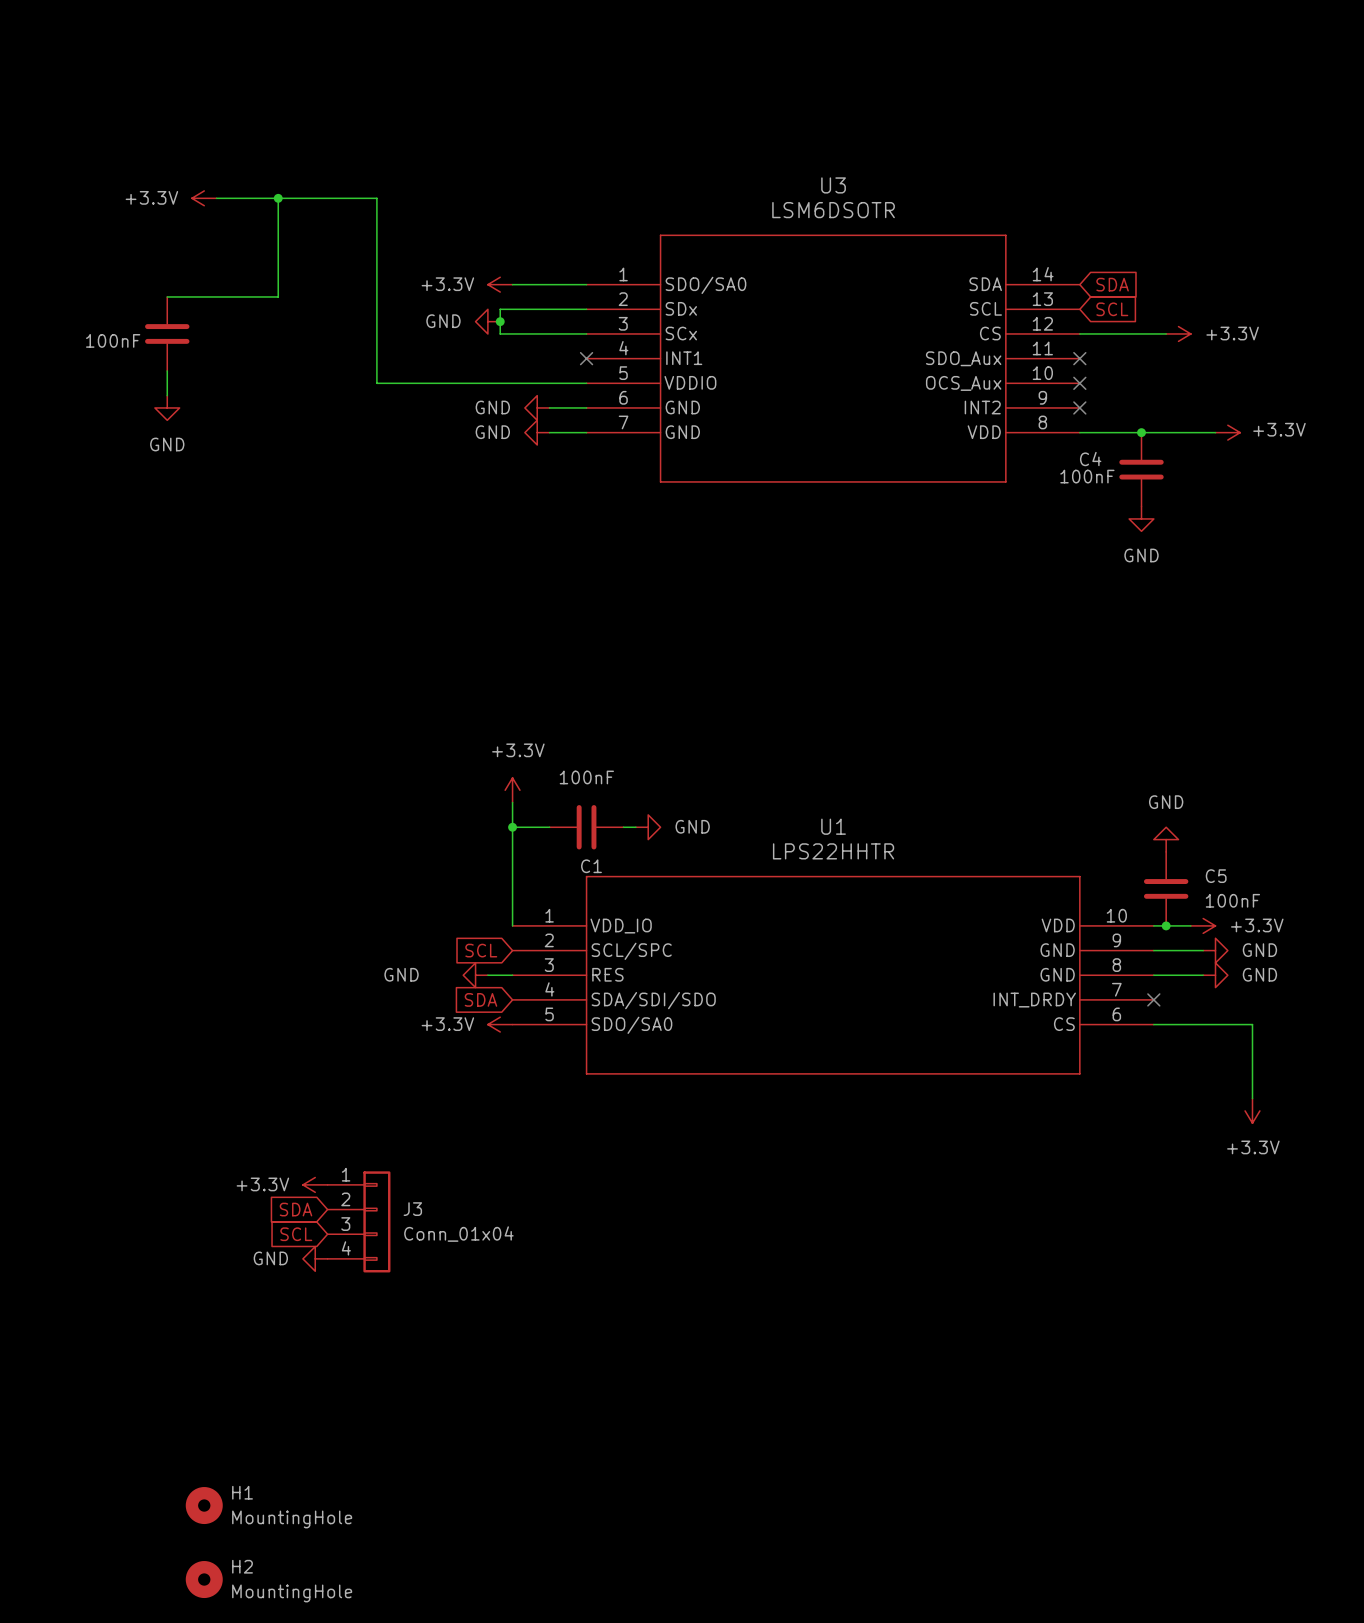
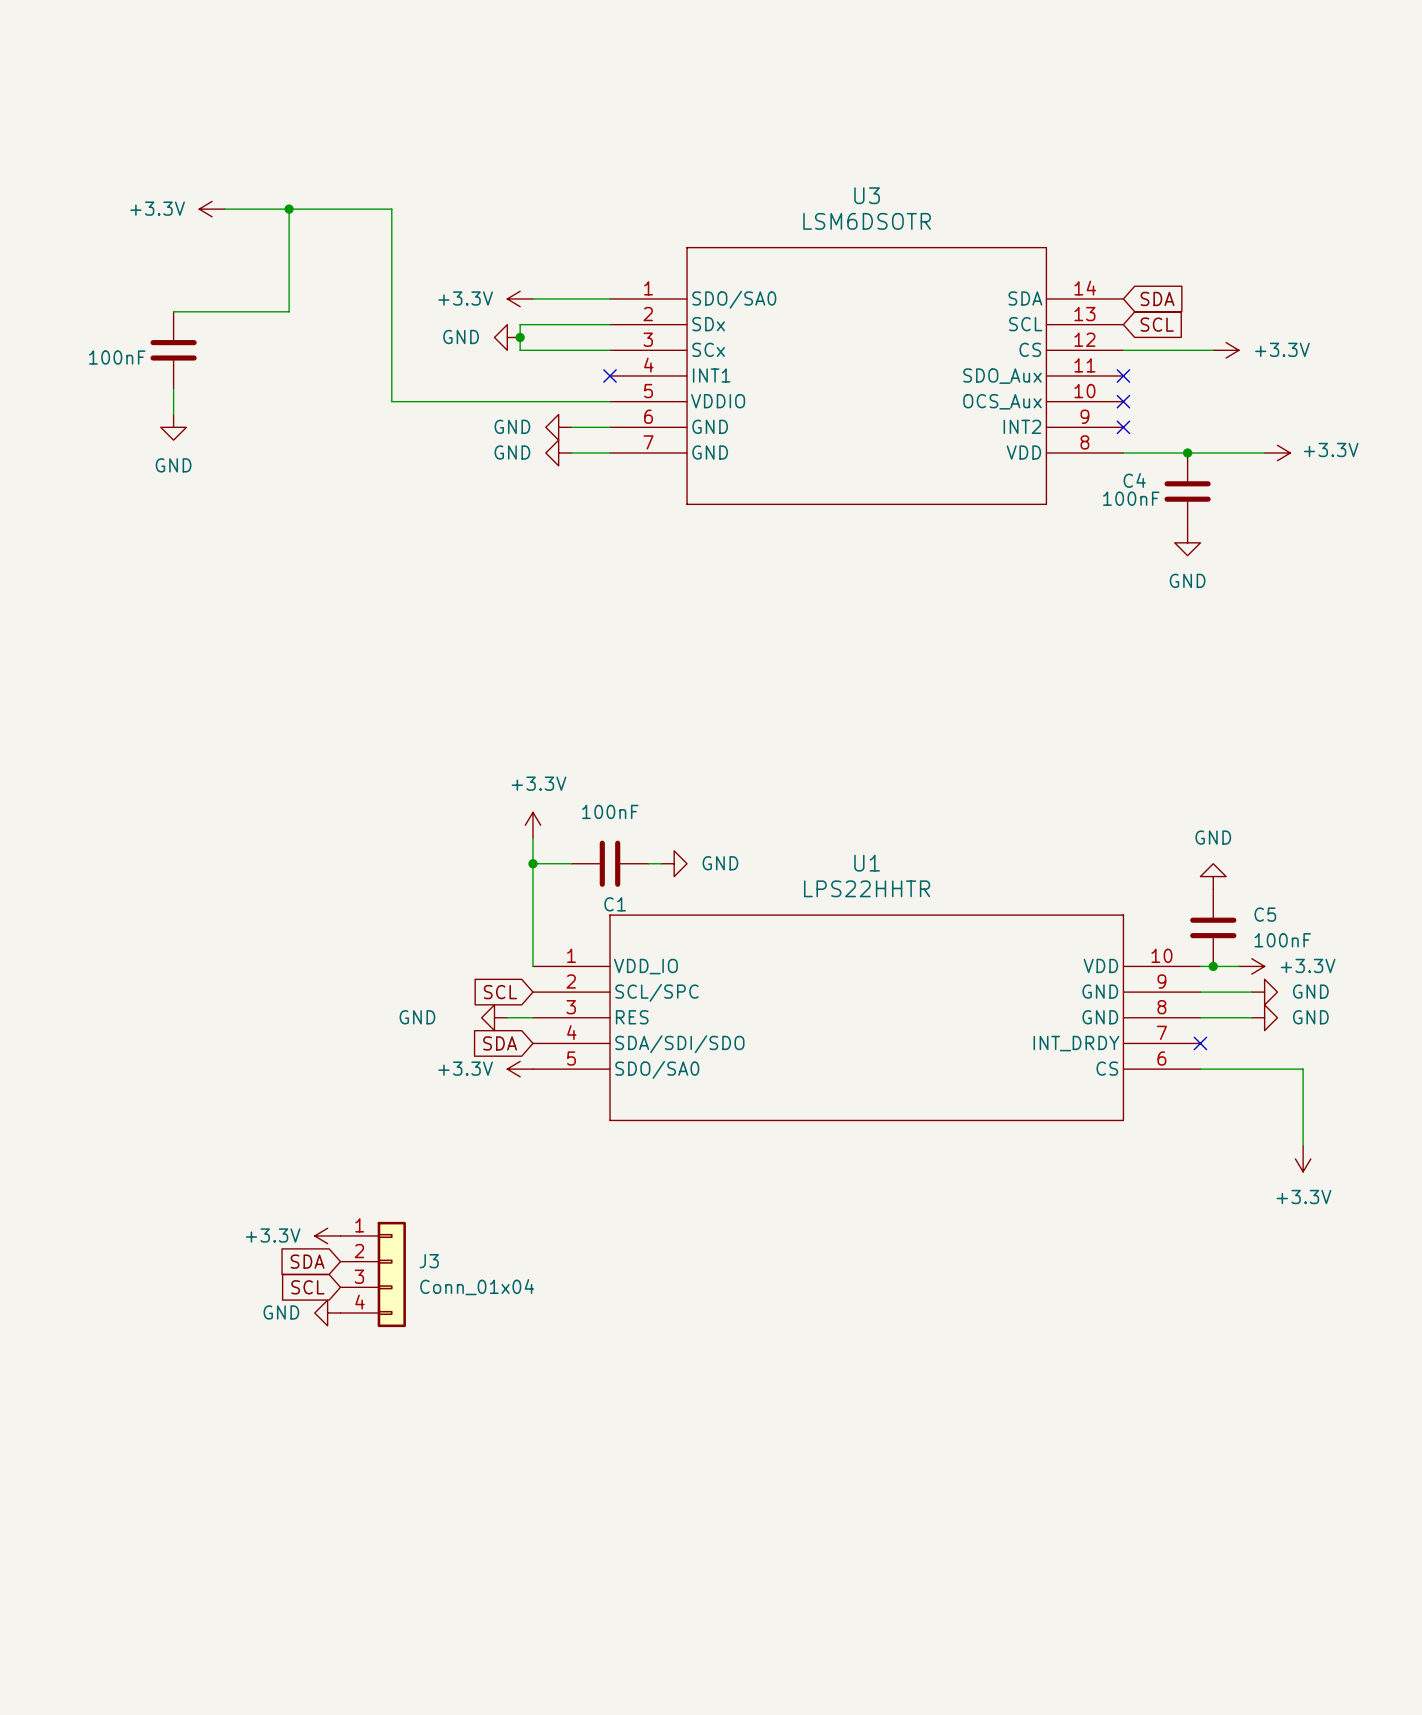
H1: MountingHole (204, 1505) -> none
H2: MountingHole (204, 1579) -> none

